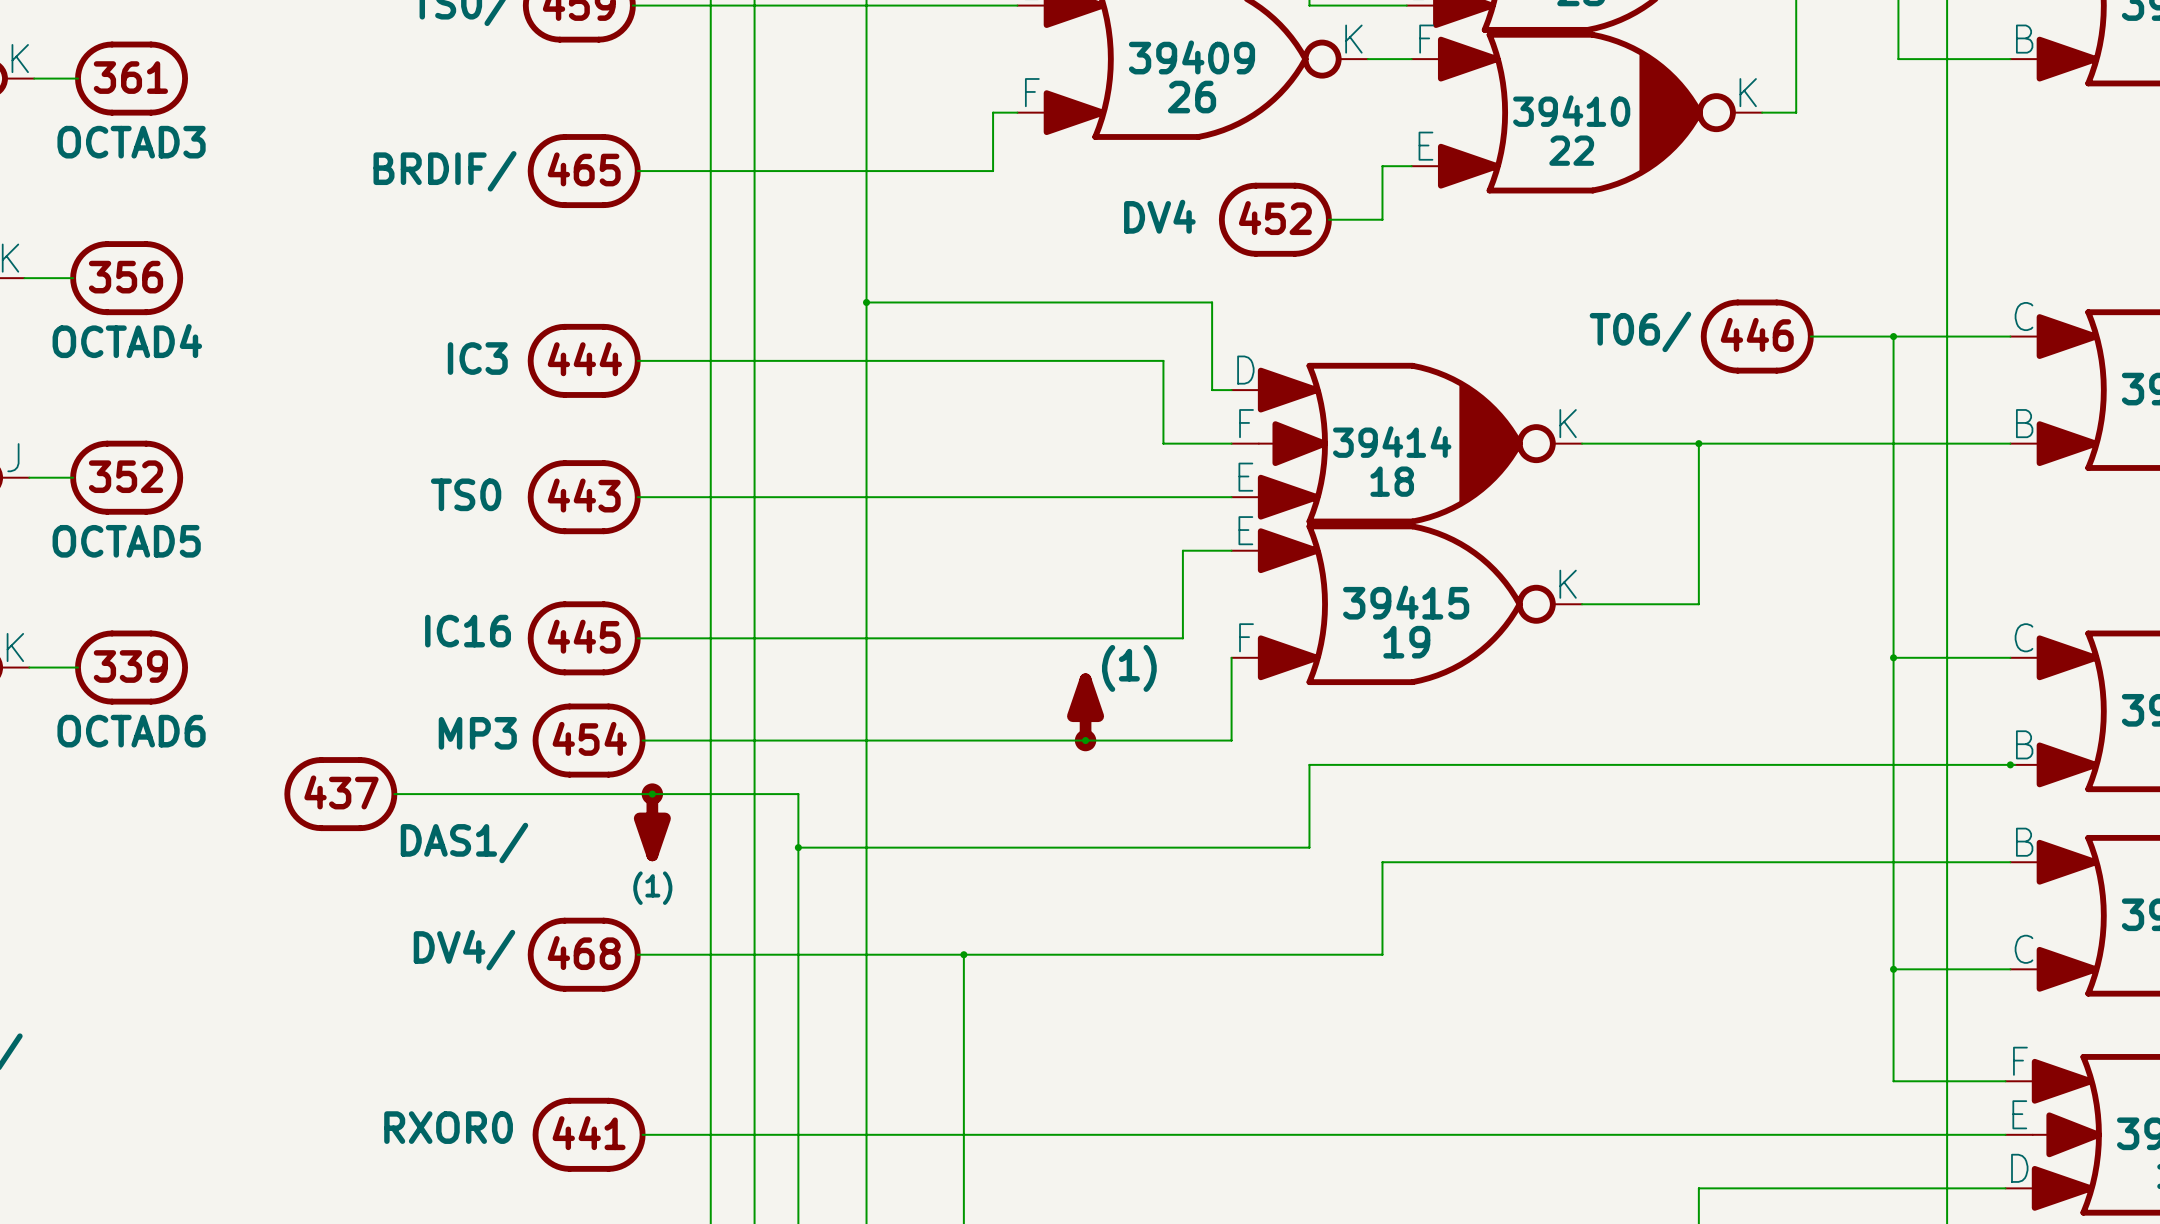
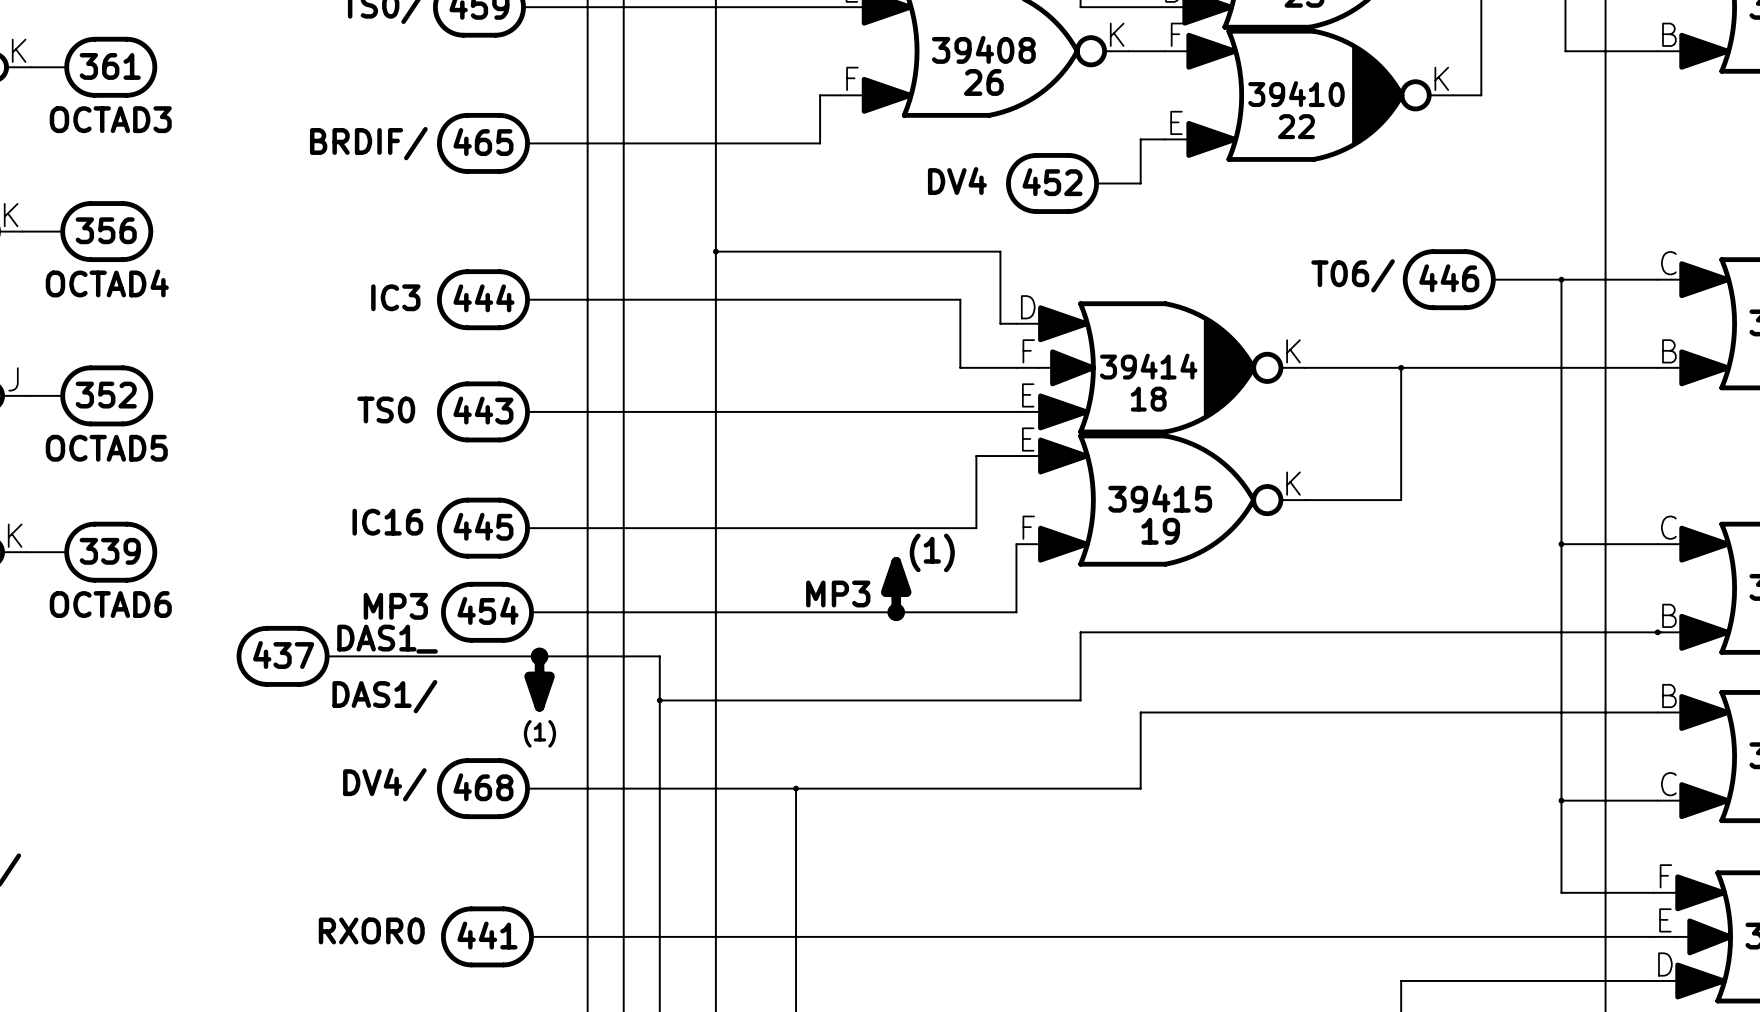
part text: 39409 (1191, 57) -> 39408 (983, 49)
label: none -> MP3 (838, 594)
label: none -> DAS1_ (387, 639)

